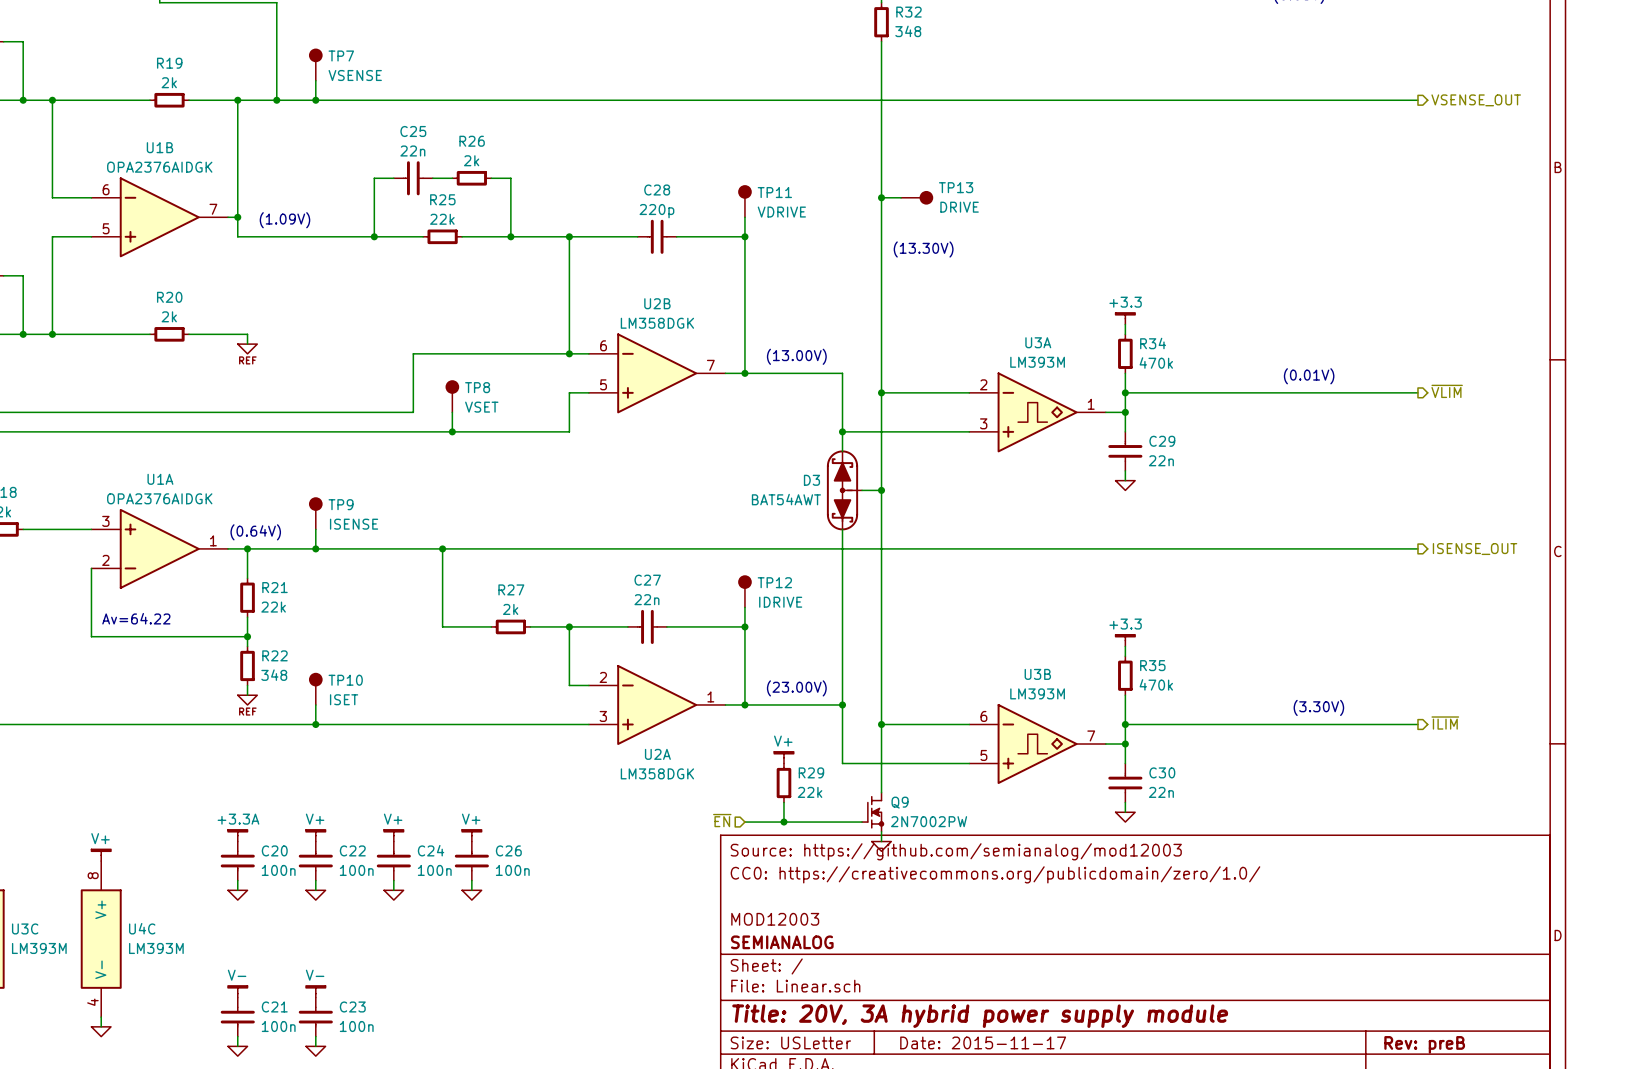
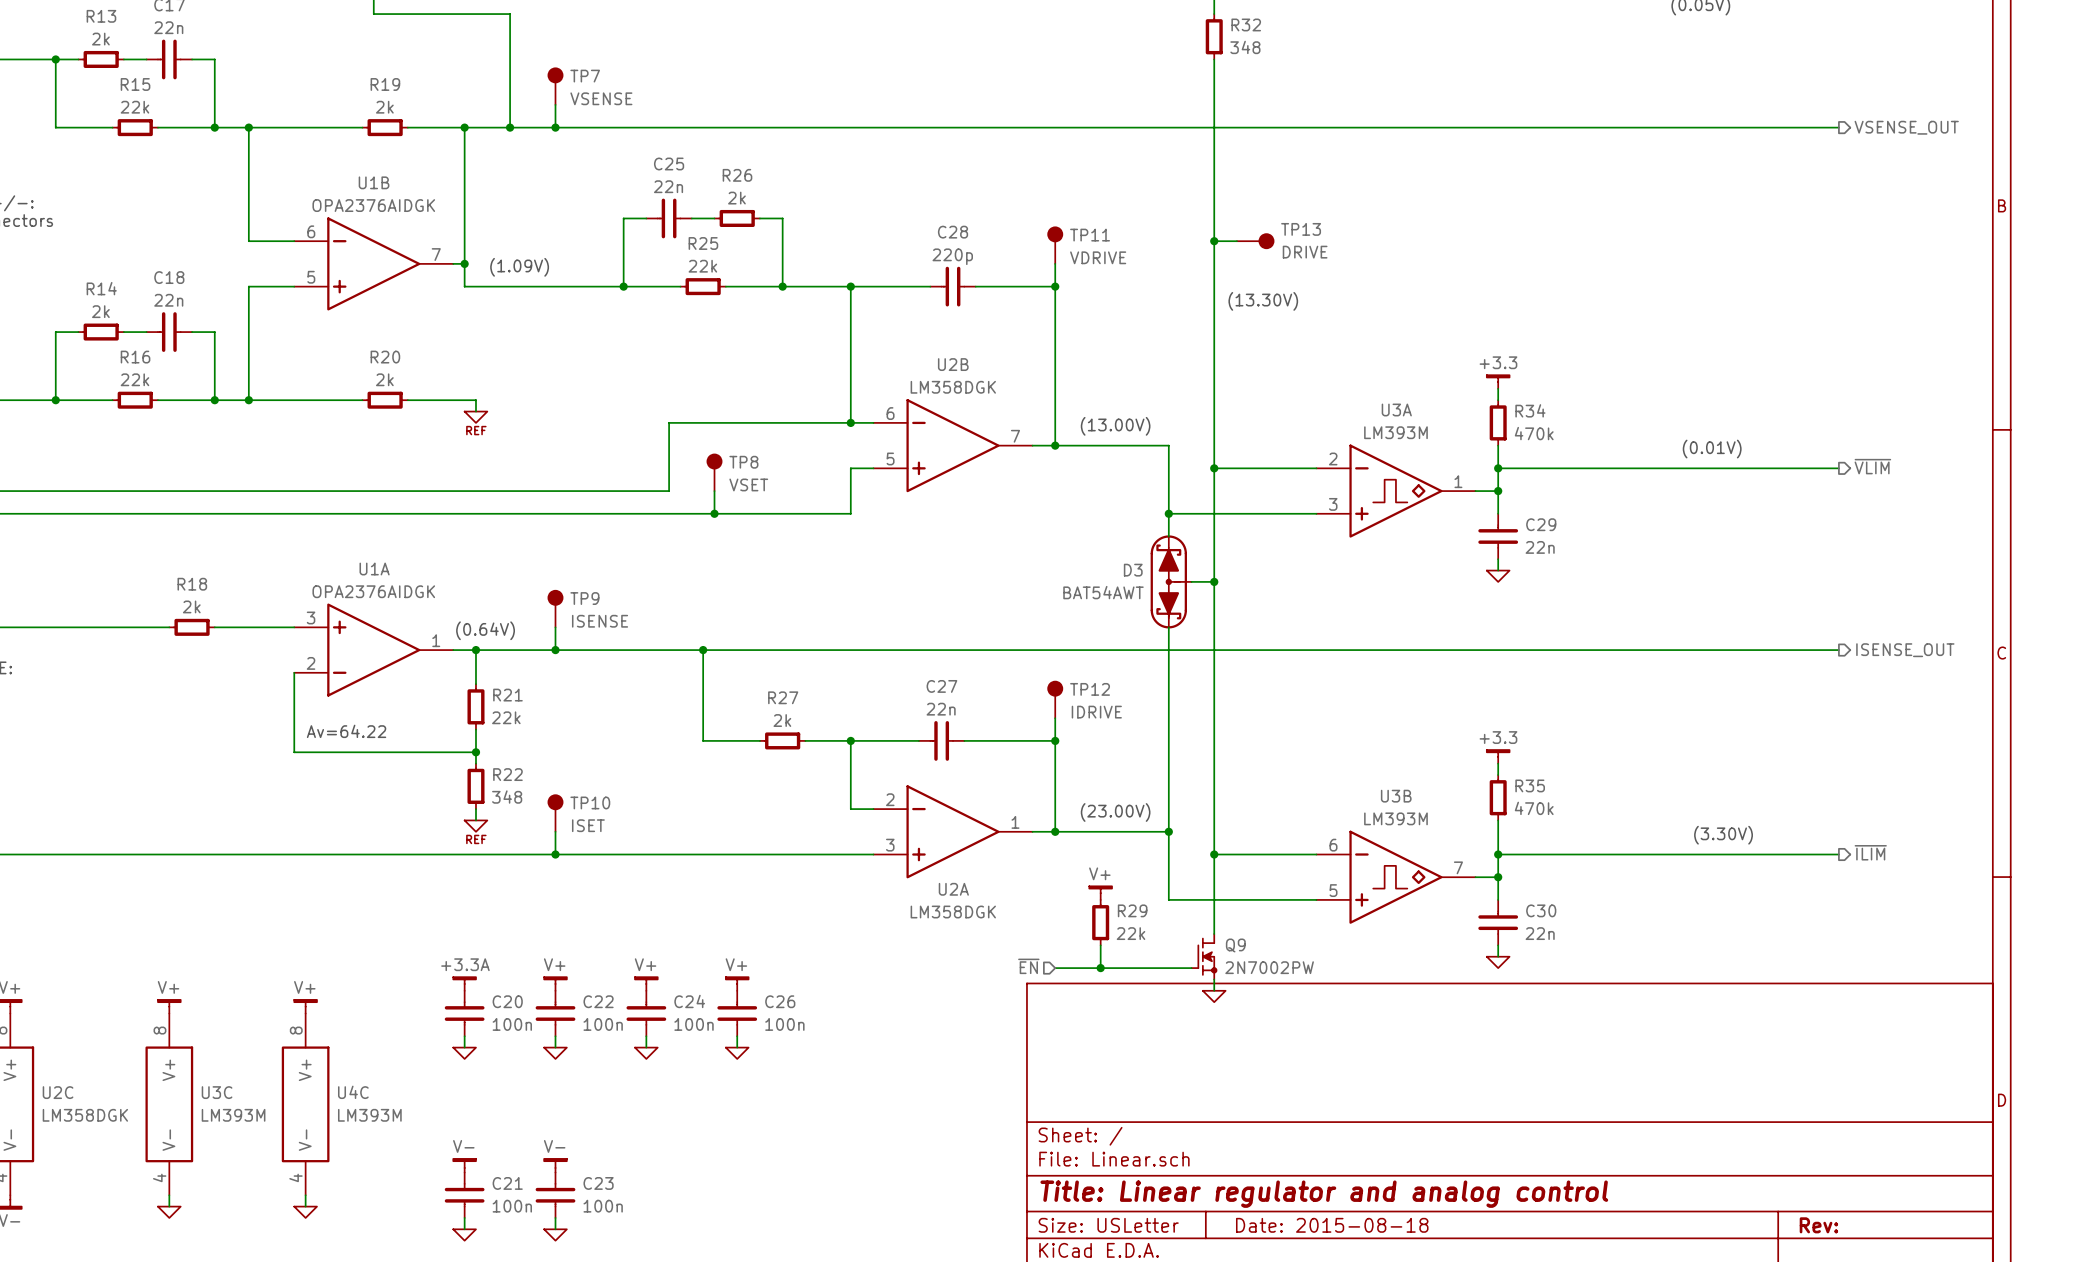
title block: Source: https://github.com/semianalog/mod12003 (956, 851) -> none
title block: CC0: https://creativecommons.org/publicdomain/zero/1.0/ (995, 874) -> none
title block: MOD12003 (775, 919) -> none
title block: SEMIANALOG (782, 942) -> none
title block: Title: 20V, 3A hybrid power supply module (980, 1016) -> Title: Linear regulator and analog control (1324, 1194)
title block: Date: 2015-11-17 (983, 1042) -> Date: 2015-08-18 (1332, 1225)
title block: Rev: preB (1424, 1044) -> Rev: (1818, 1225)

